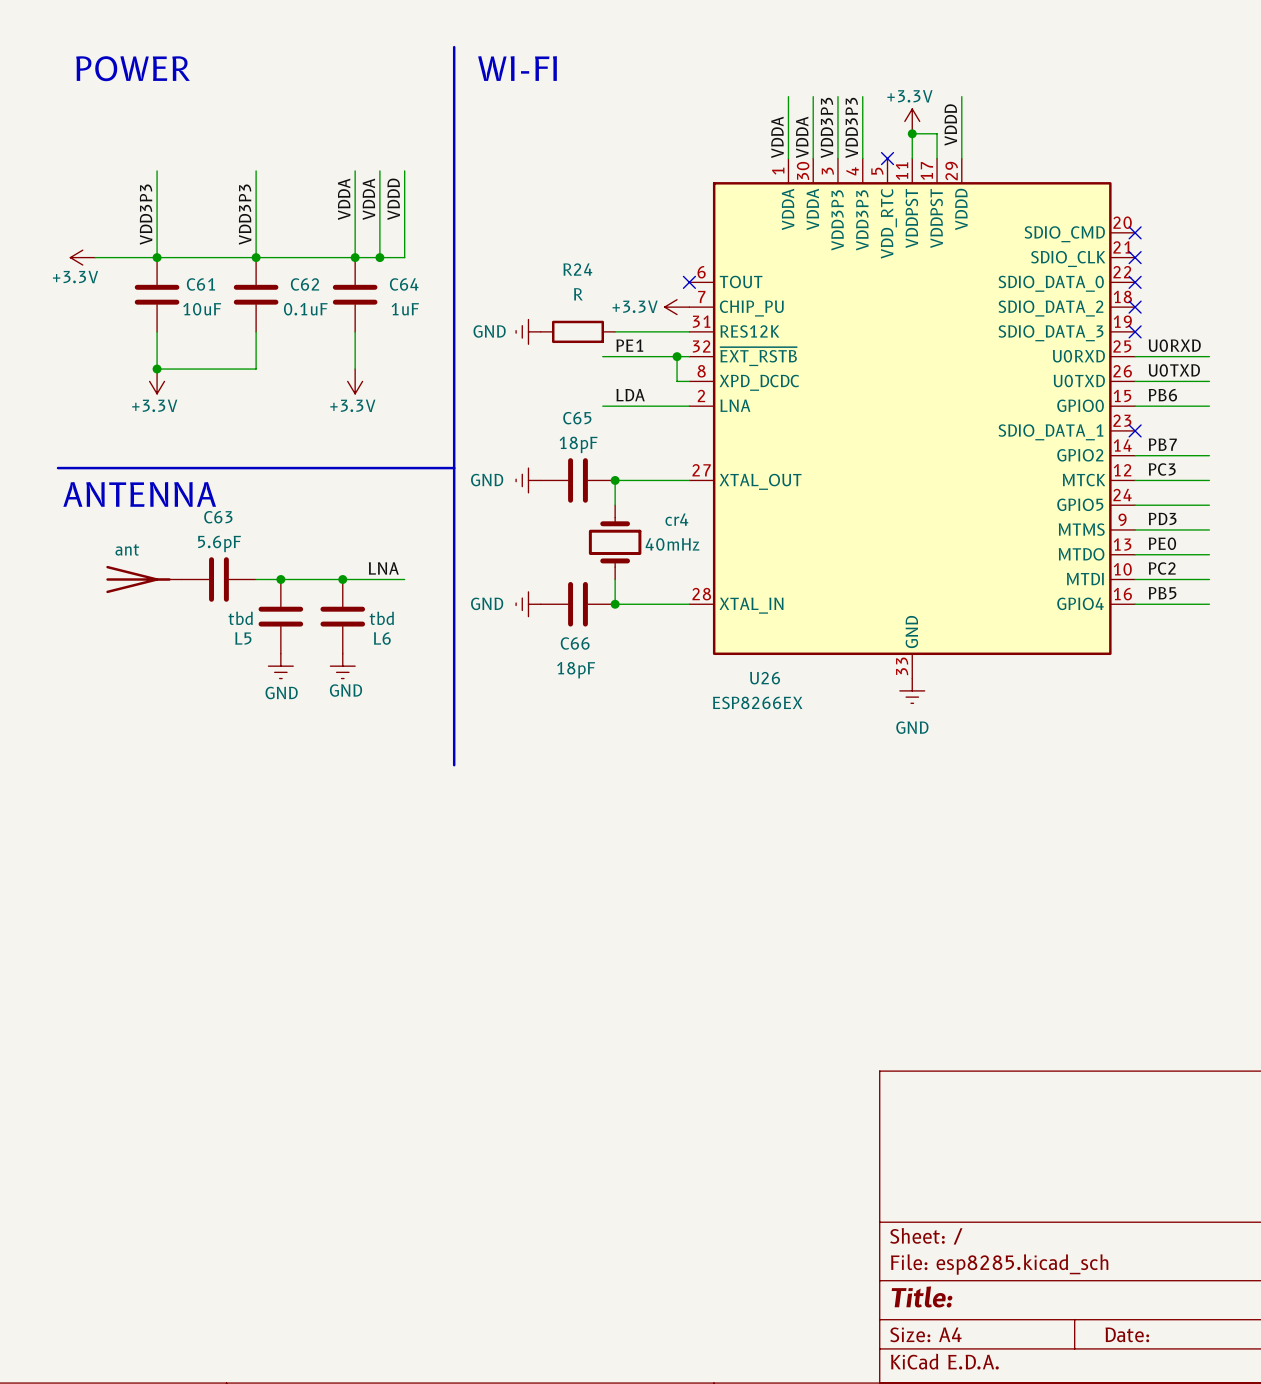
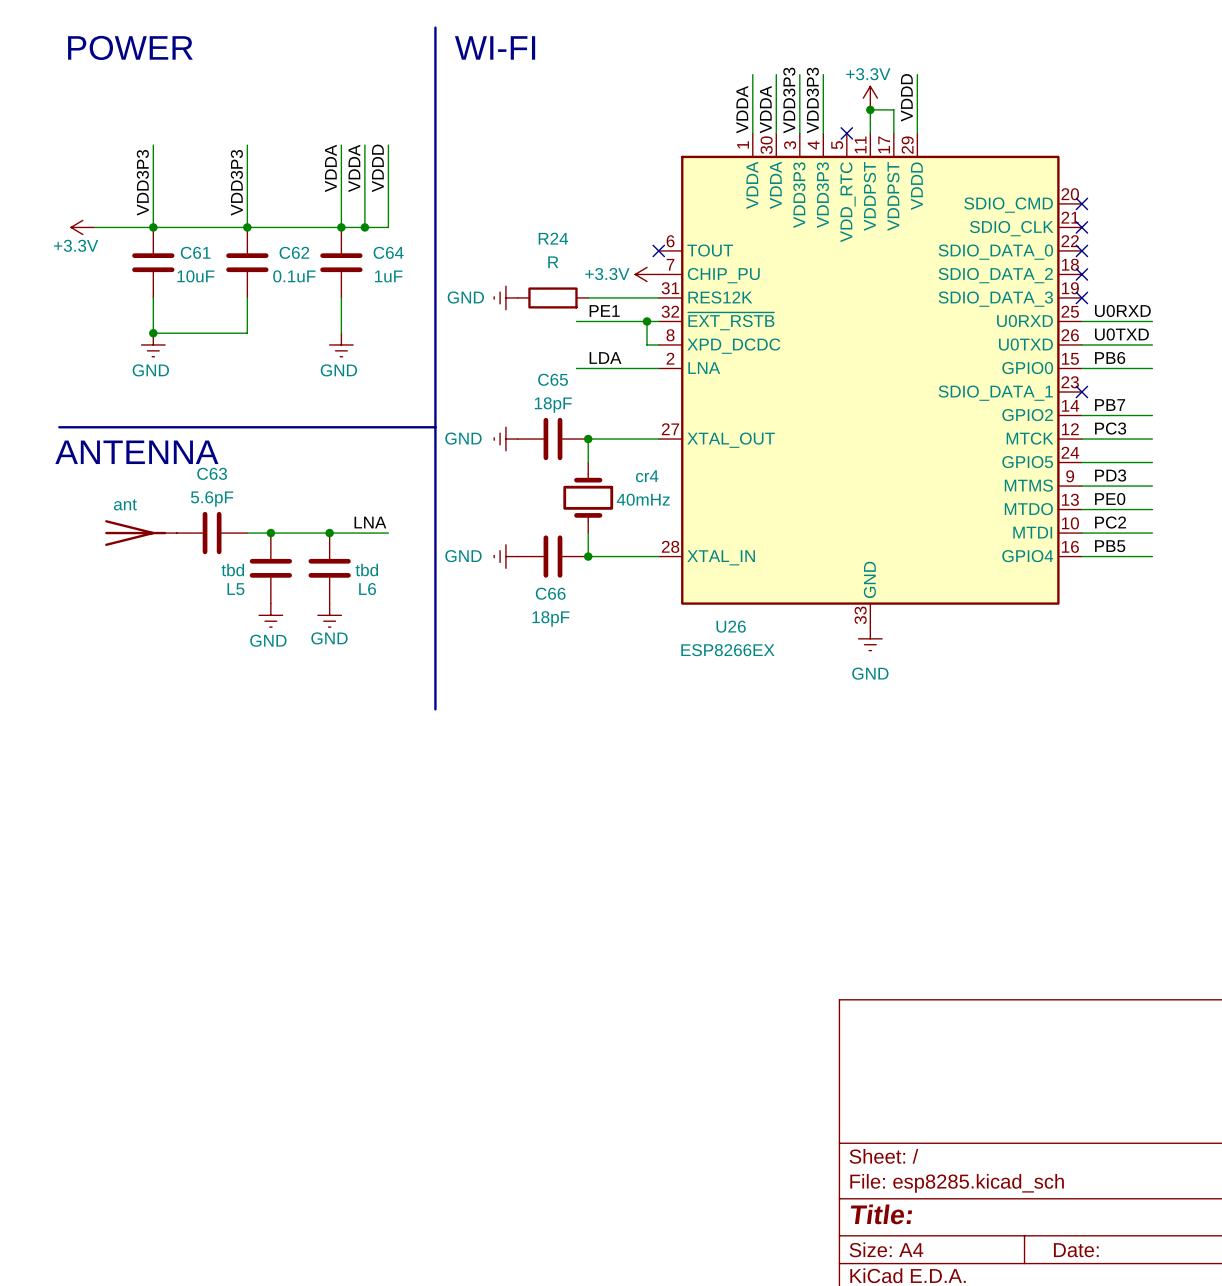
power symbol: +3.3V (157, 381) -> GND (153, 344)
power symbol: +3.3V (355, 381) -> GND (341, 344)

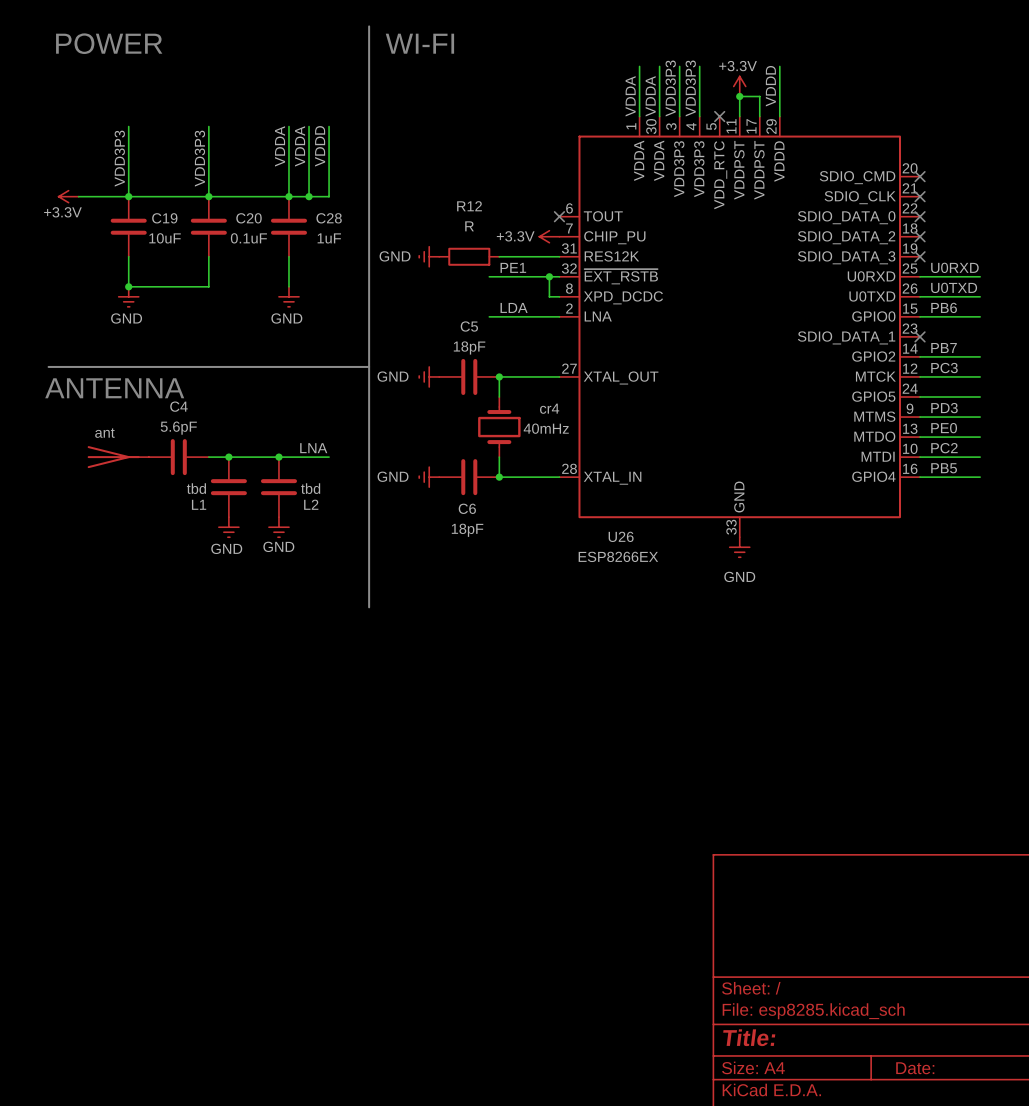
R24 name: R24 (553, 238) -> R12 (469, 206)
C61 name: C61 (195, 252) -> C19 (164, 218)
C62 name: C62 (294, 252) -> C20 (249, 218)
C64 name: C64 (388, 252) -> C28 (329, 218)
C65 name: C65 (553, 379) -> C5 (469, 326)
C63 name: C63 (212, 473) -> C4 (178, 406)
L5 name: L5 (235, 589) -> L1 (199, 504)
L6 name: L6 (367, 589) -> L2 (311, 504)
C66 name: C66 (550, 593) -> C6 (467, 508)

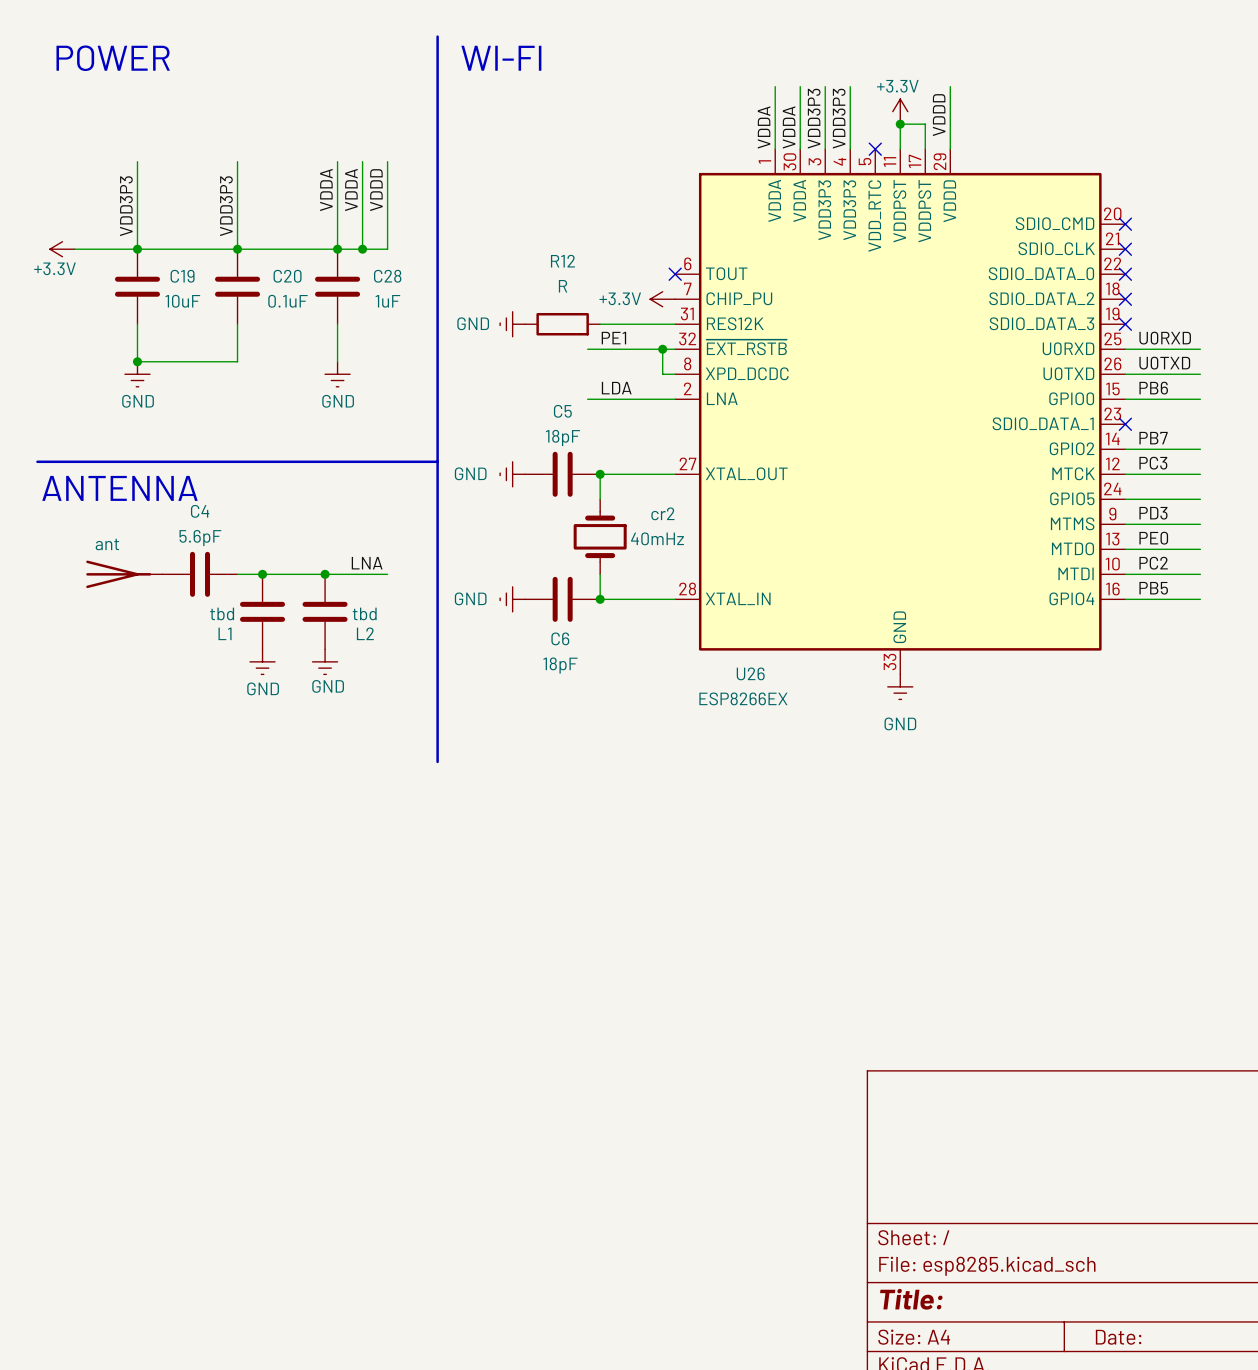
cr4 name: cr4 (549, 408) -> cr2 (662, 513)

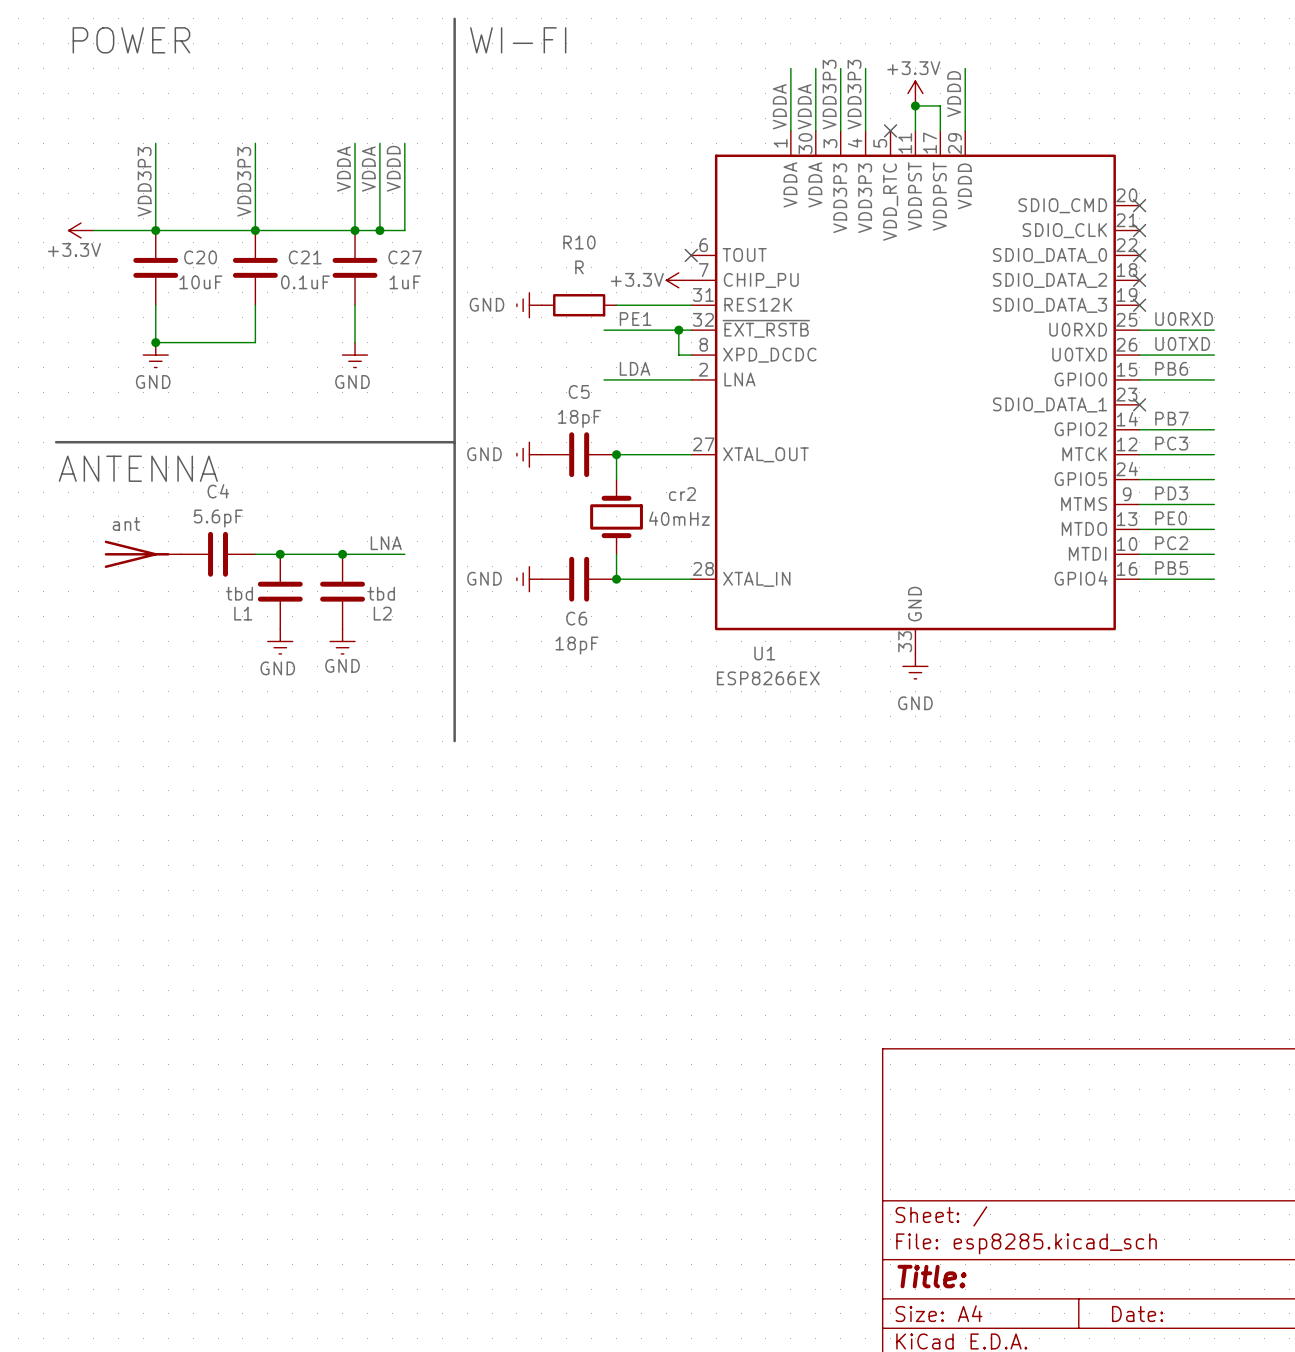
R12 name: R12 (562, 261) -> R10 (579, 242)
C19 name: C19 (182, 276) -> C20 (200, 257)
C20 name: C20 (287, 276) -> C21 (305, 257)
C28 name: C28 (387, 276) -> C27 (405, 257)
U26 name: U26 (750, 673) -> U1 (764, 653)

